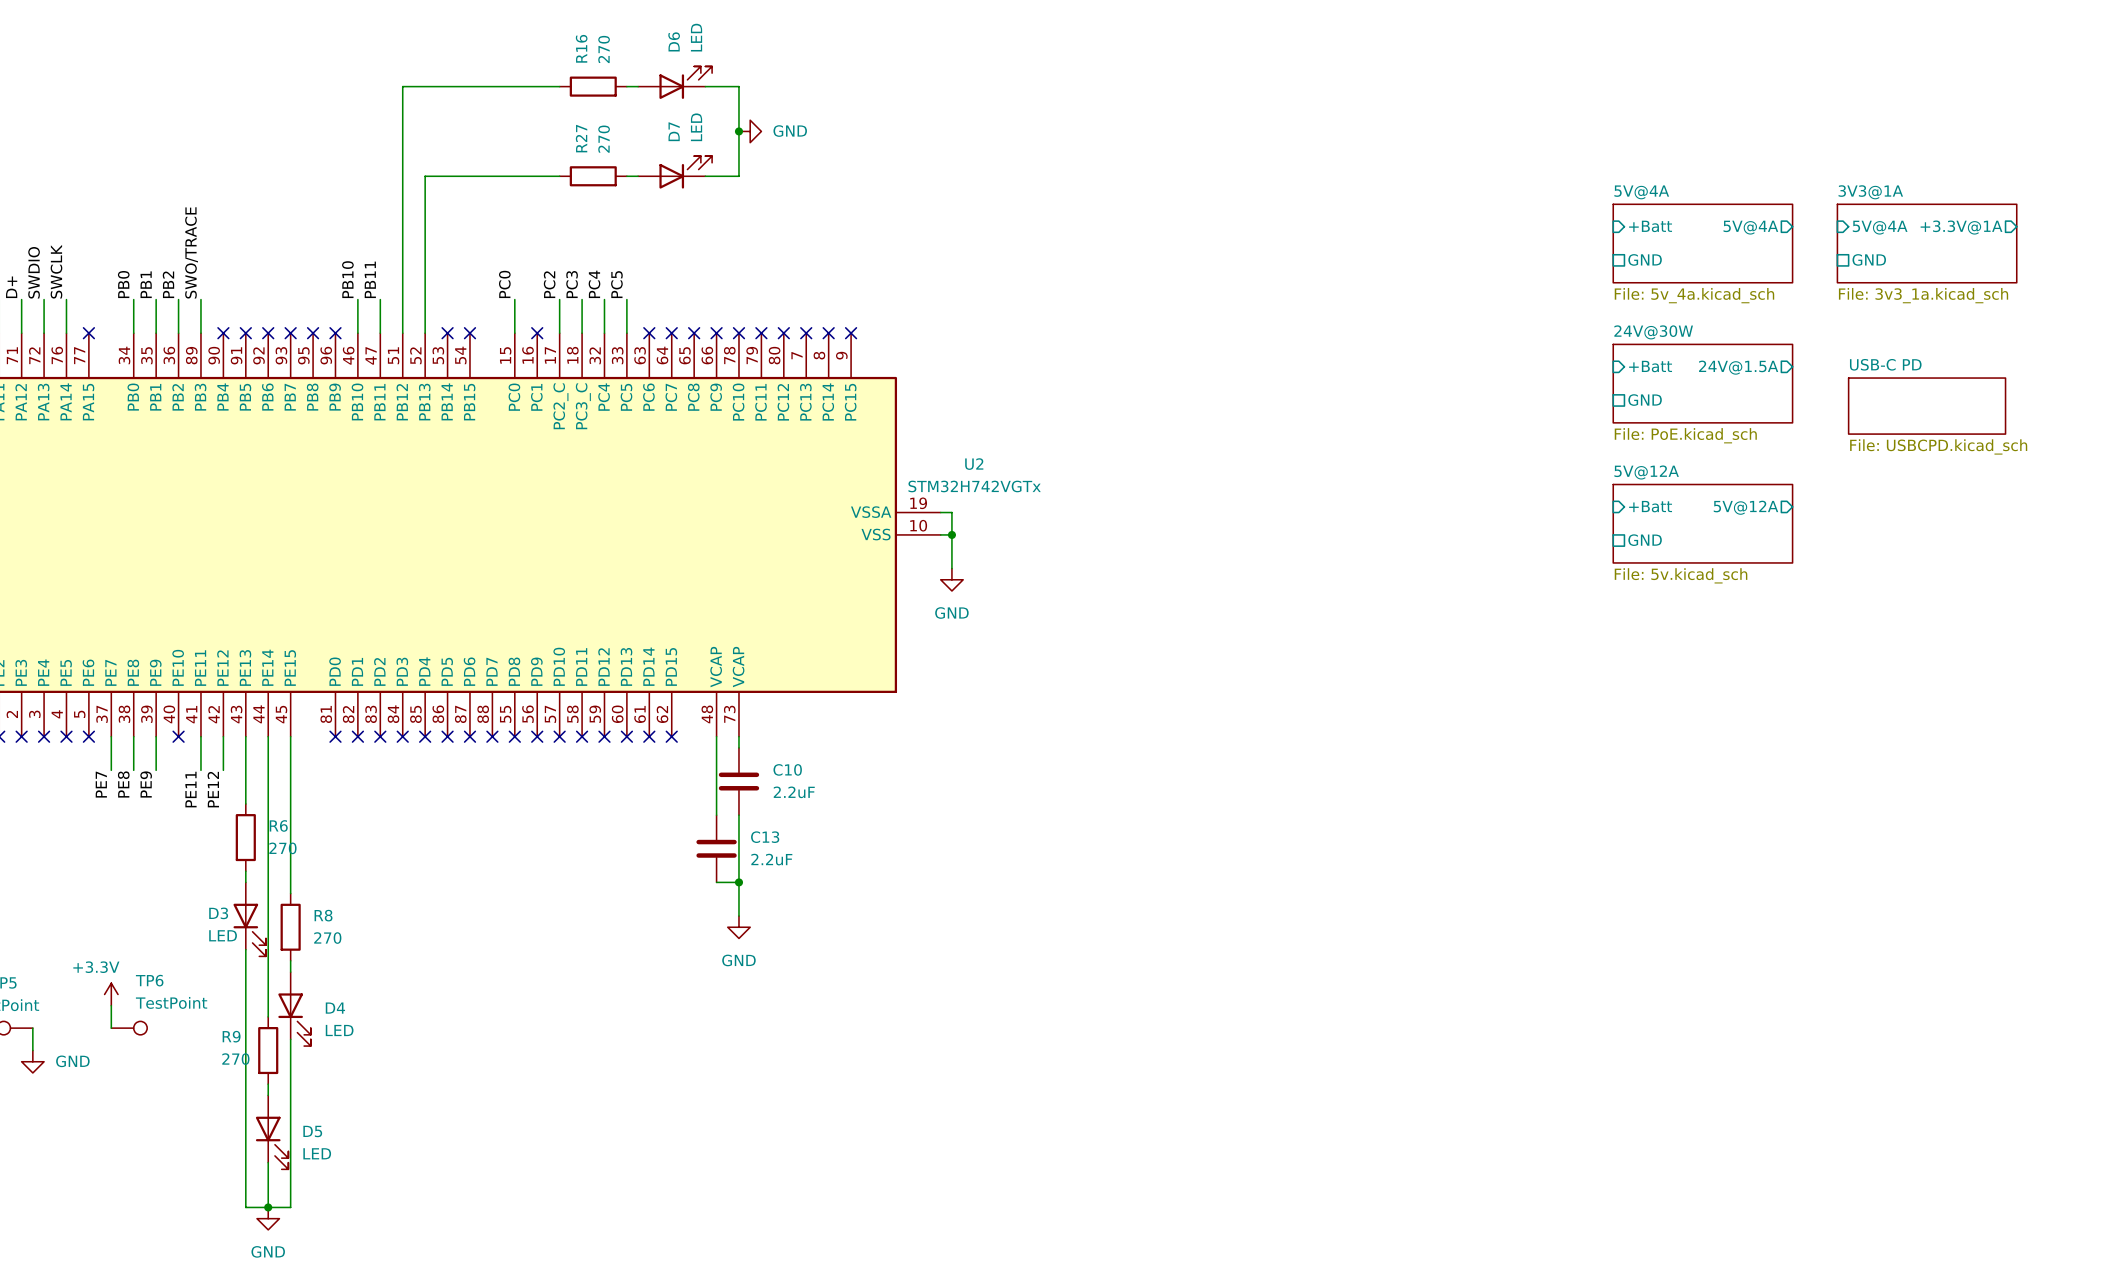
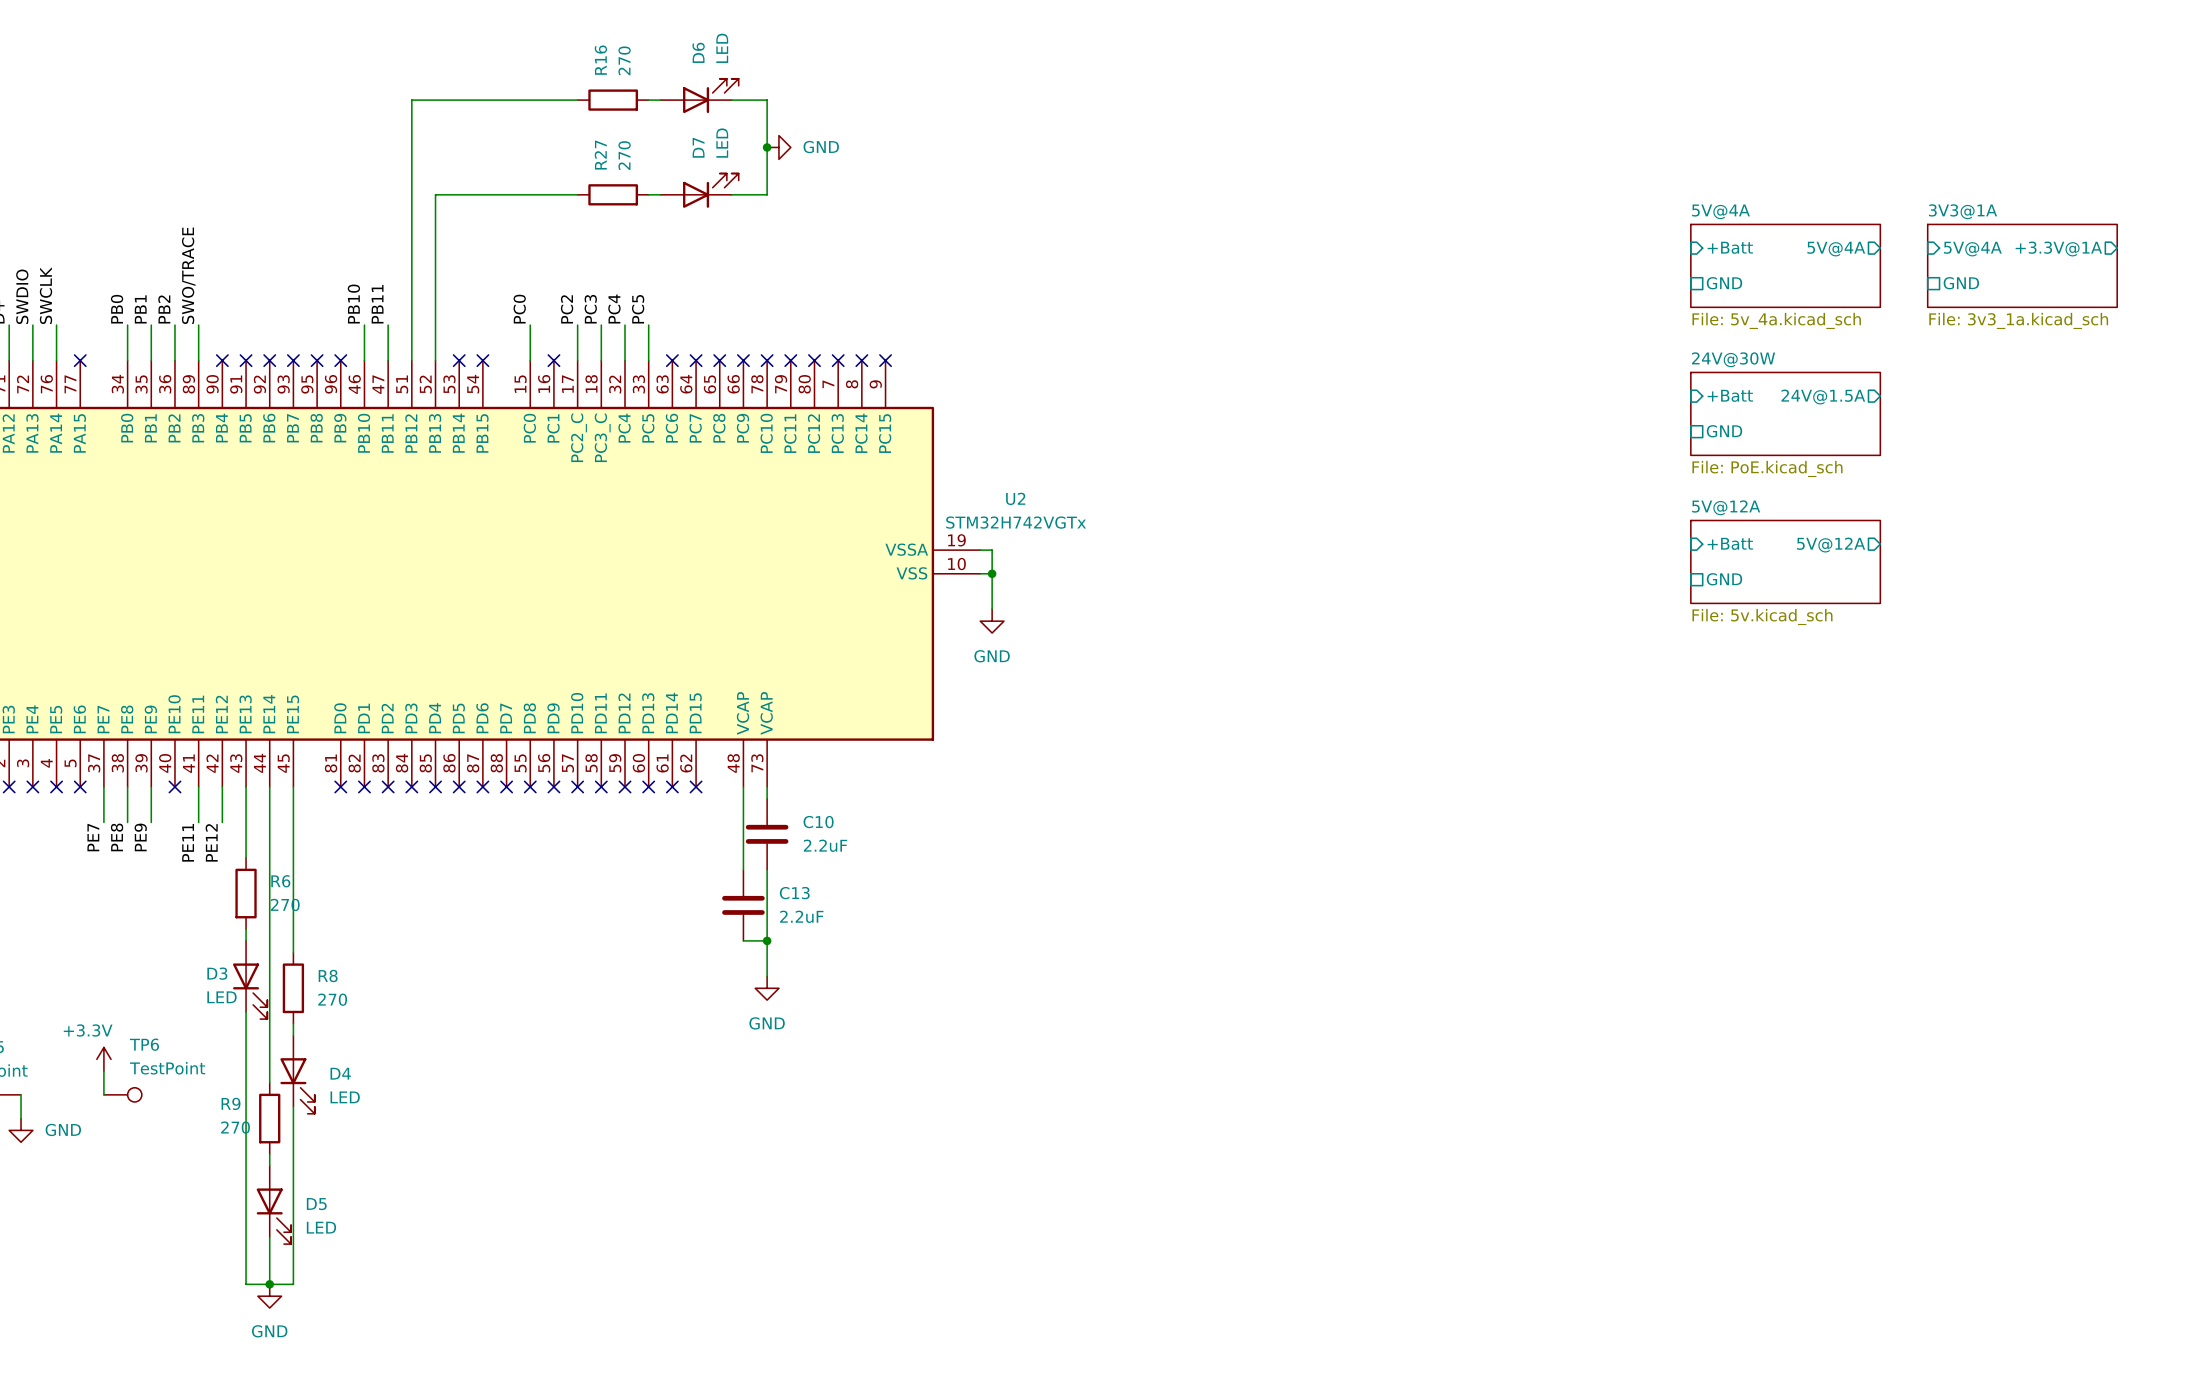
sheet USB-C PD: File: USBCPD.kicad_sch (1927, 406) -> none

